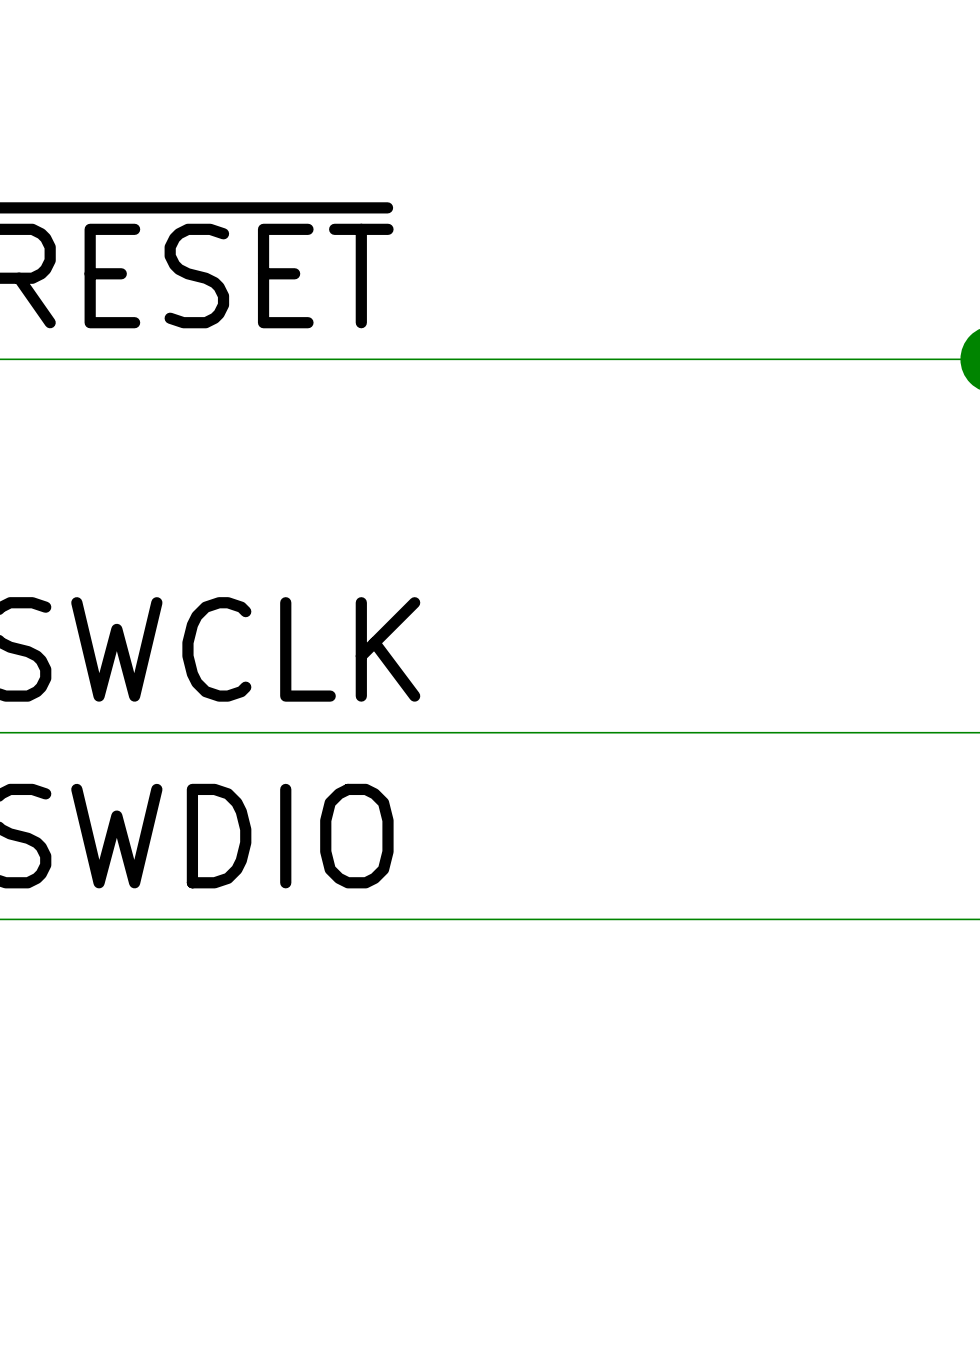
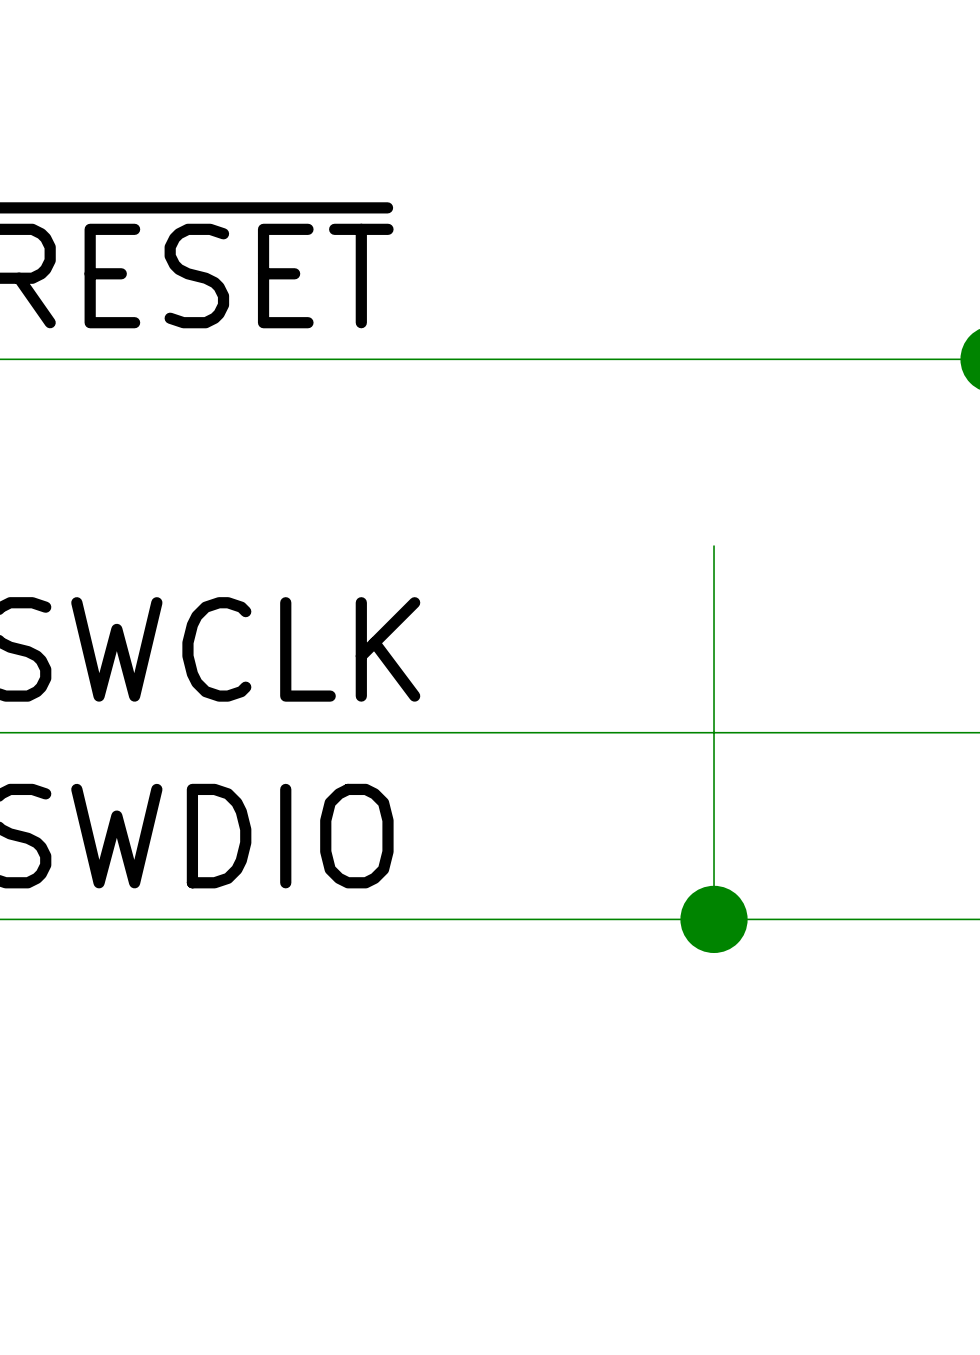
wire: none -> (714, 546) (714, 919)
junction: none -> (714, 919)

